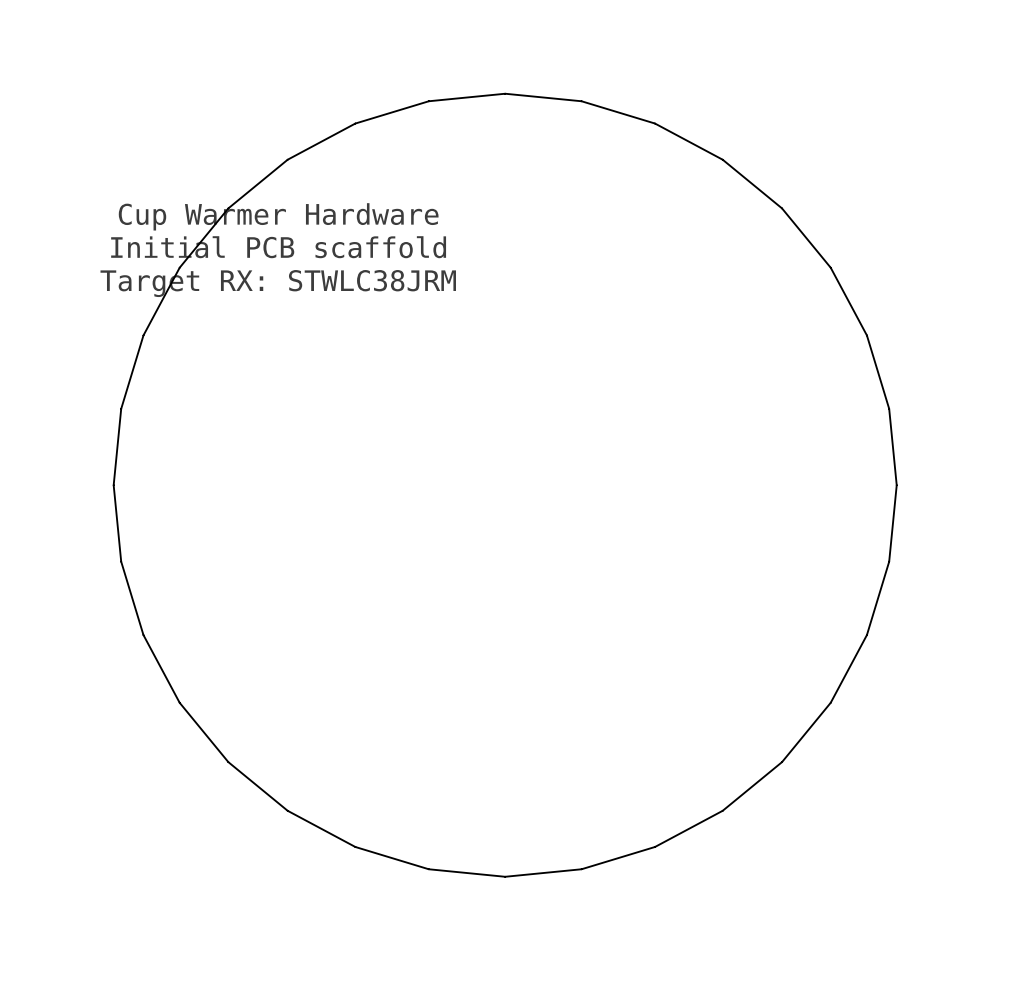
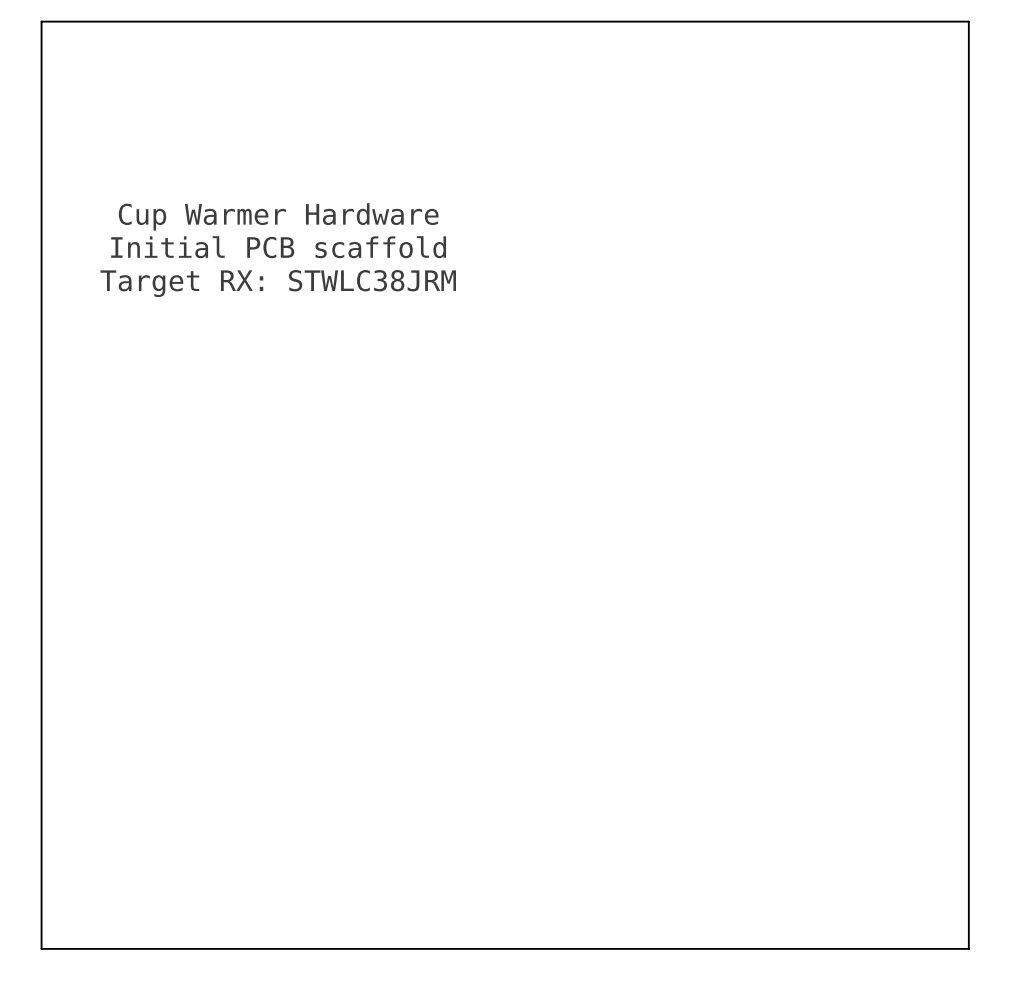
board edge: (505, 93) (428, 101) (355, 123) (287, 159) (228, 208) (179, 267) (143, 335) (121, 408) (113, 485) (121, 561) (143, 635) (179, 702) (228, 762) (287, 810) (355, 846) (428, 869) (505, 876) (581, 869) (655, 846) (722, 810) (782, 762) (830, 702) (866, 635) (889, 561) (896, 485) (889, 408) (866, 335) (830, 267) (782, 208) (722, 159) (655, 123) (581, 101) (505, 93) -> (41, 21) (41, 948) (968, 948) (968, 21) (41, 21)

